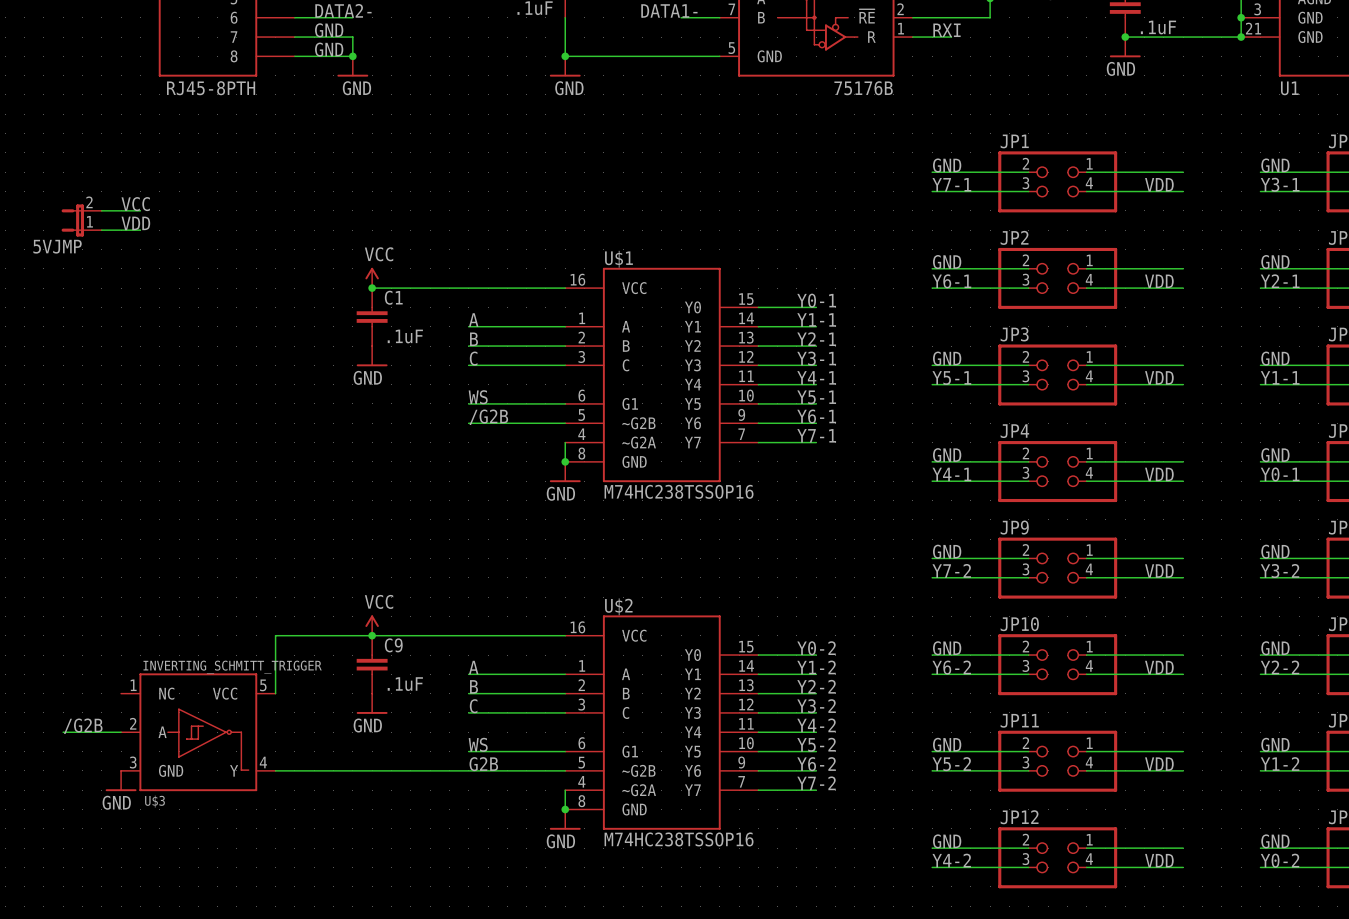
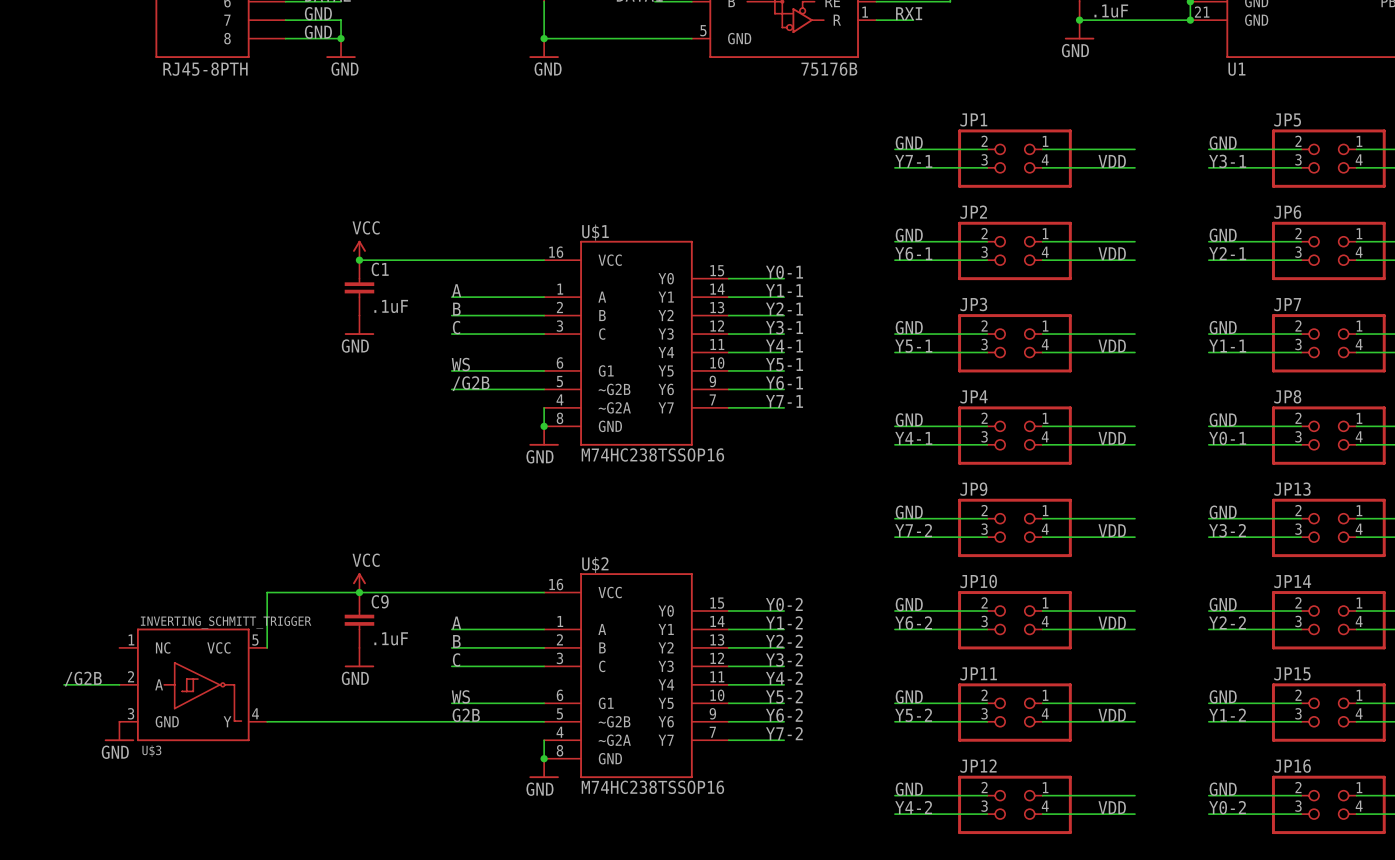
label: VCC (135, 204) -> none
wire: (101, 210) (140, 210) -> none
5VJMP: (81, 220) -> none
label: VDD (135, 223) -> none
wire: (101, 230) (140, 230) -> none

